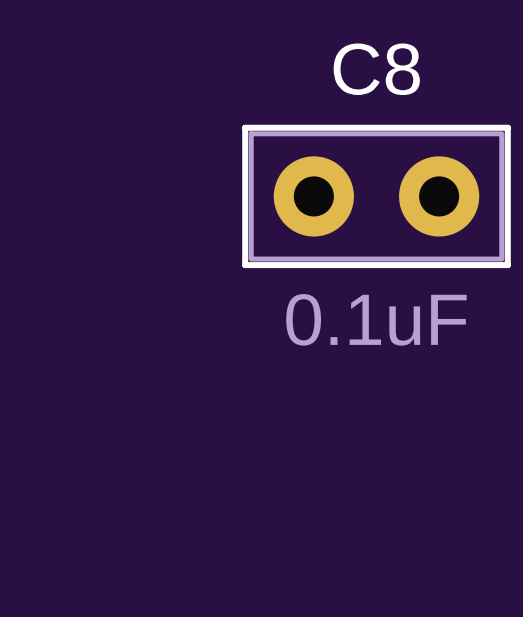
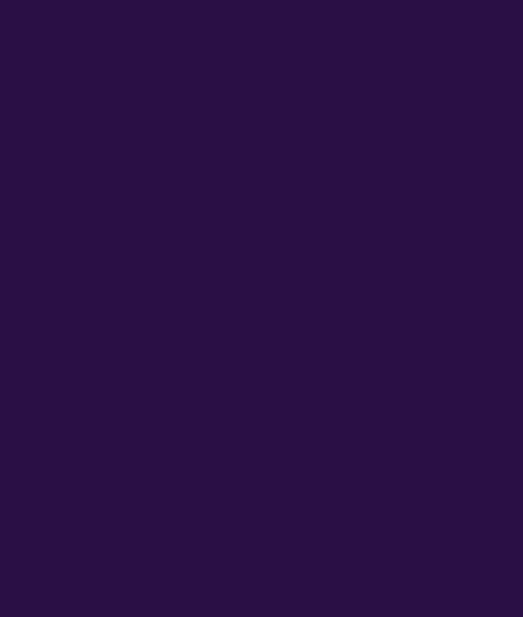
C8: 0.1uF (376, 196) -> none

